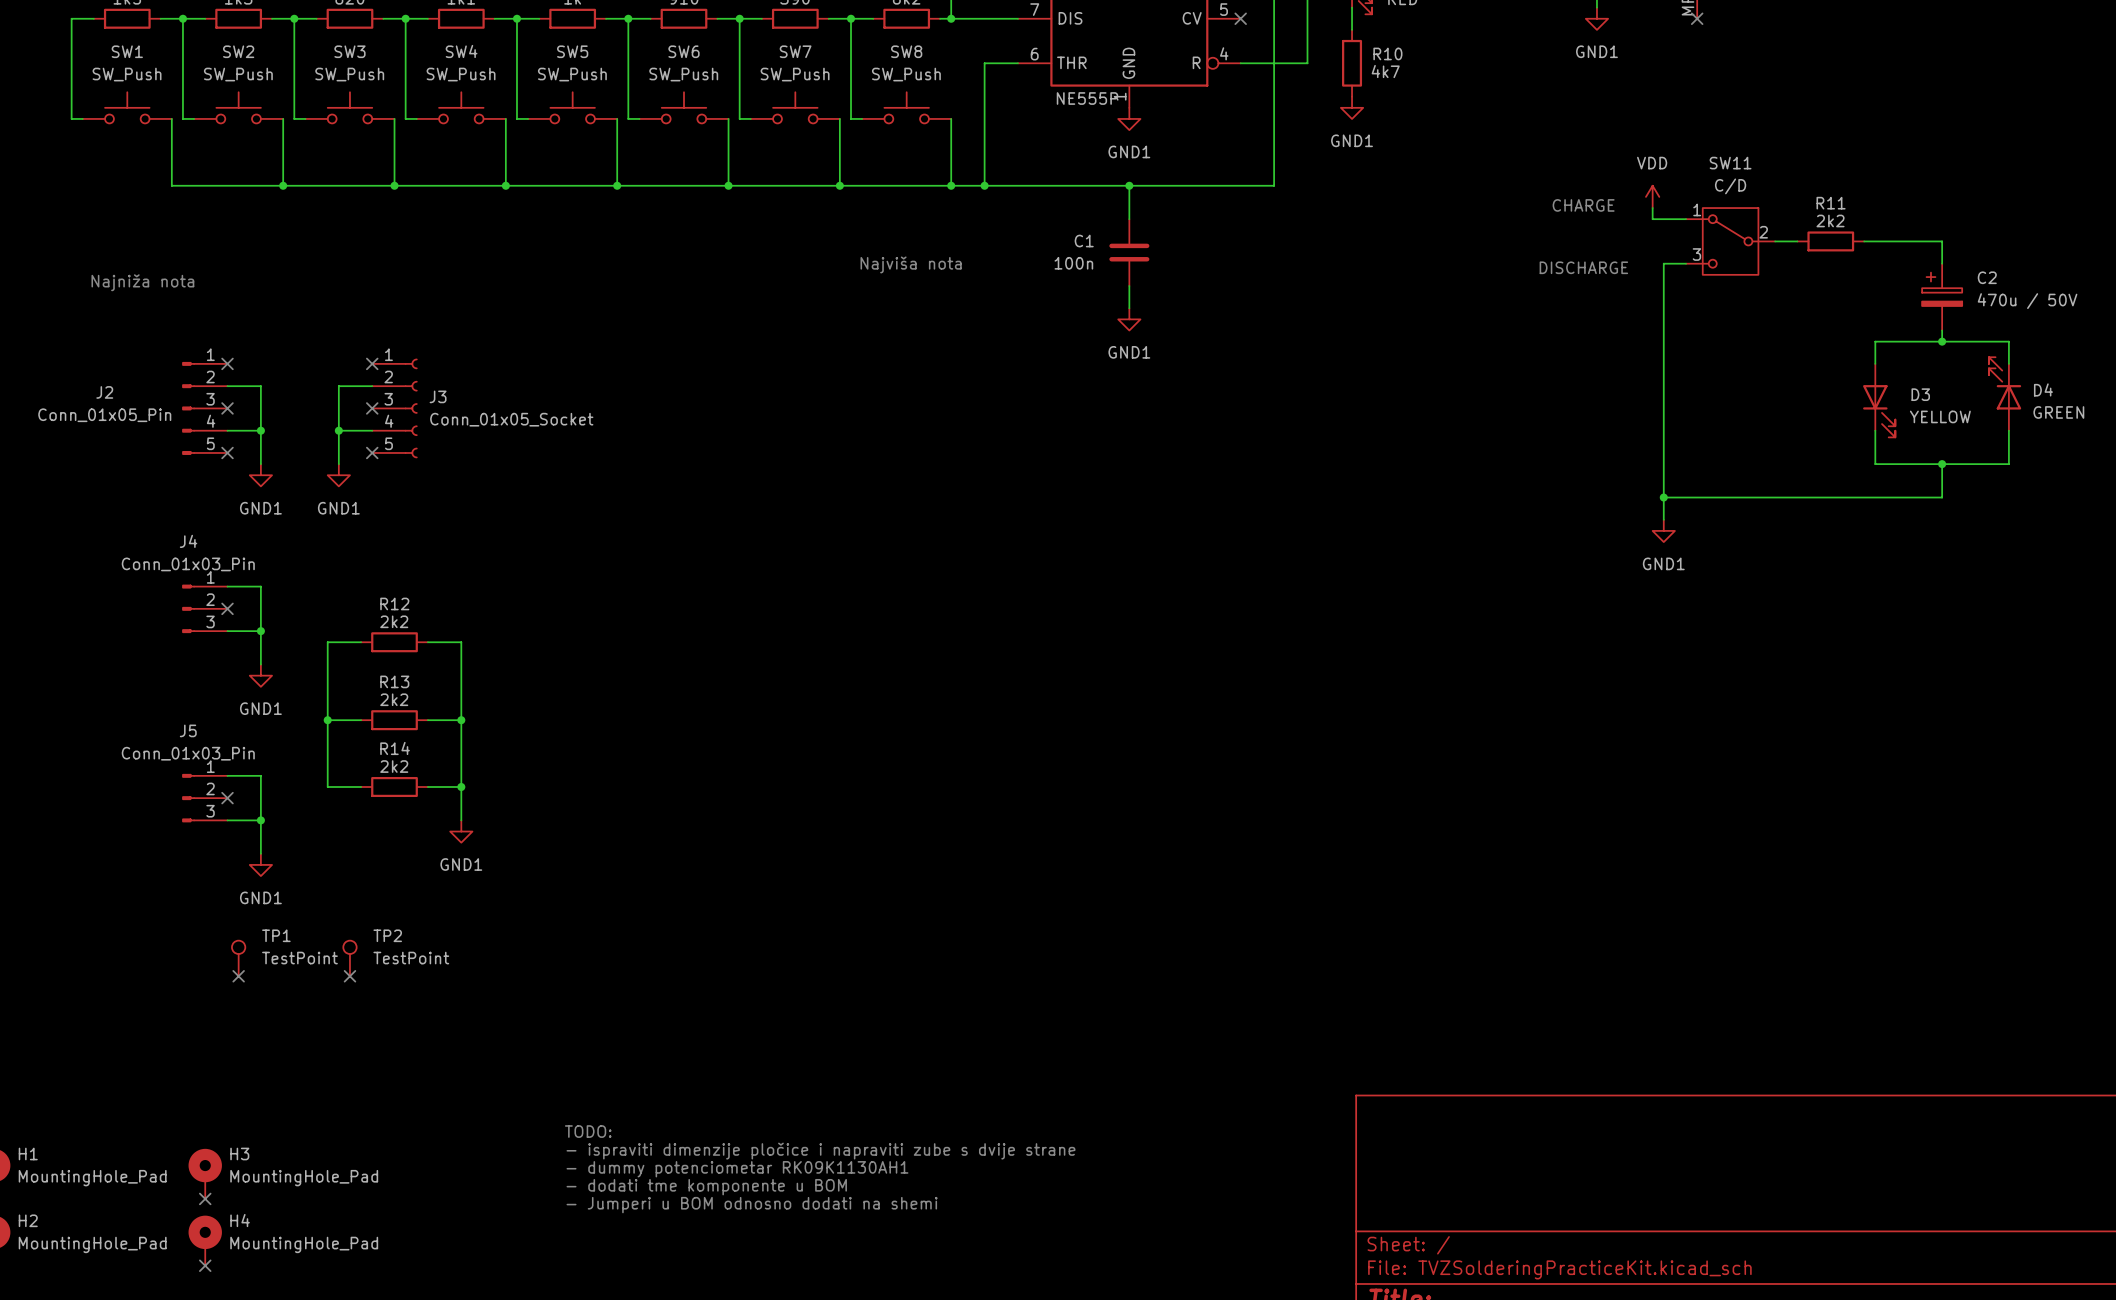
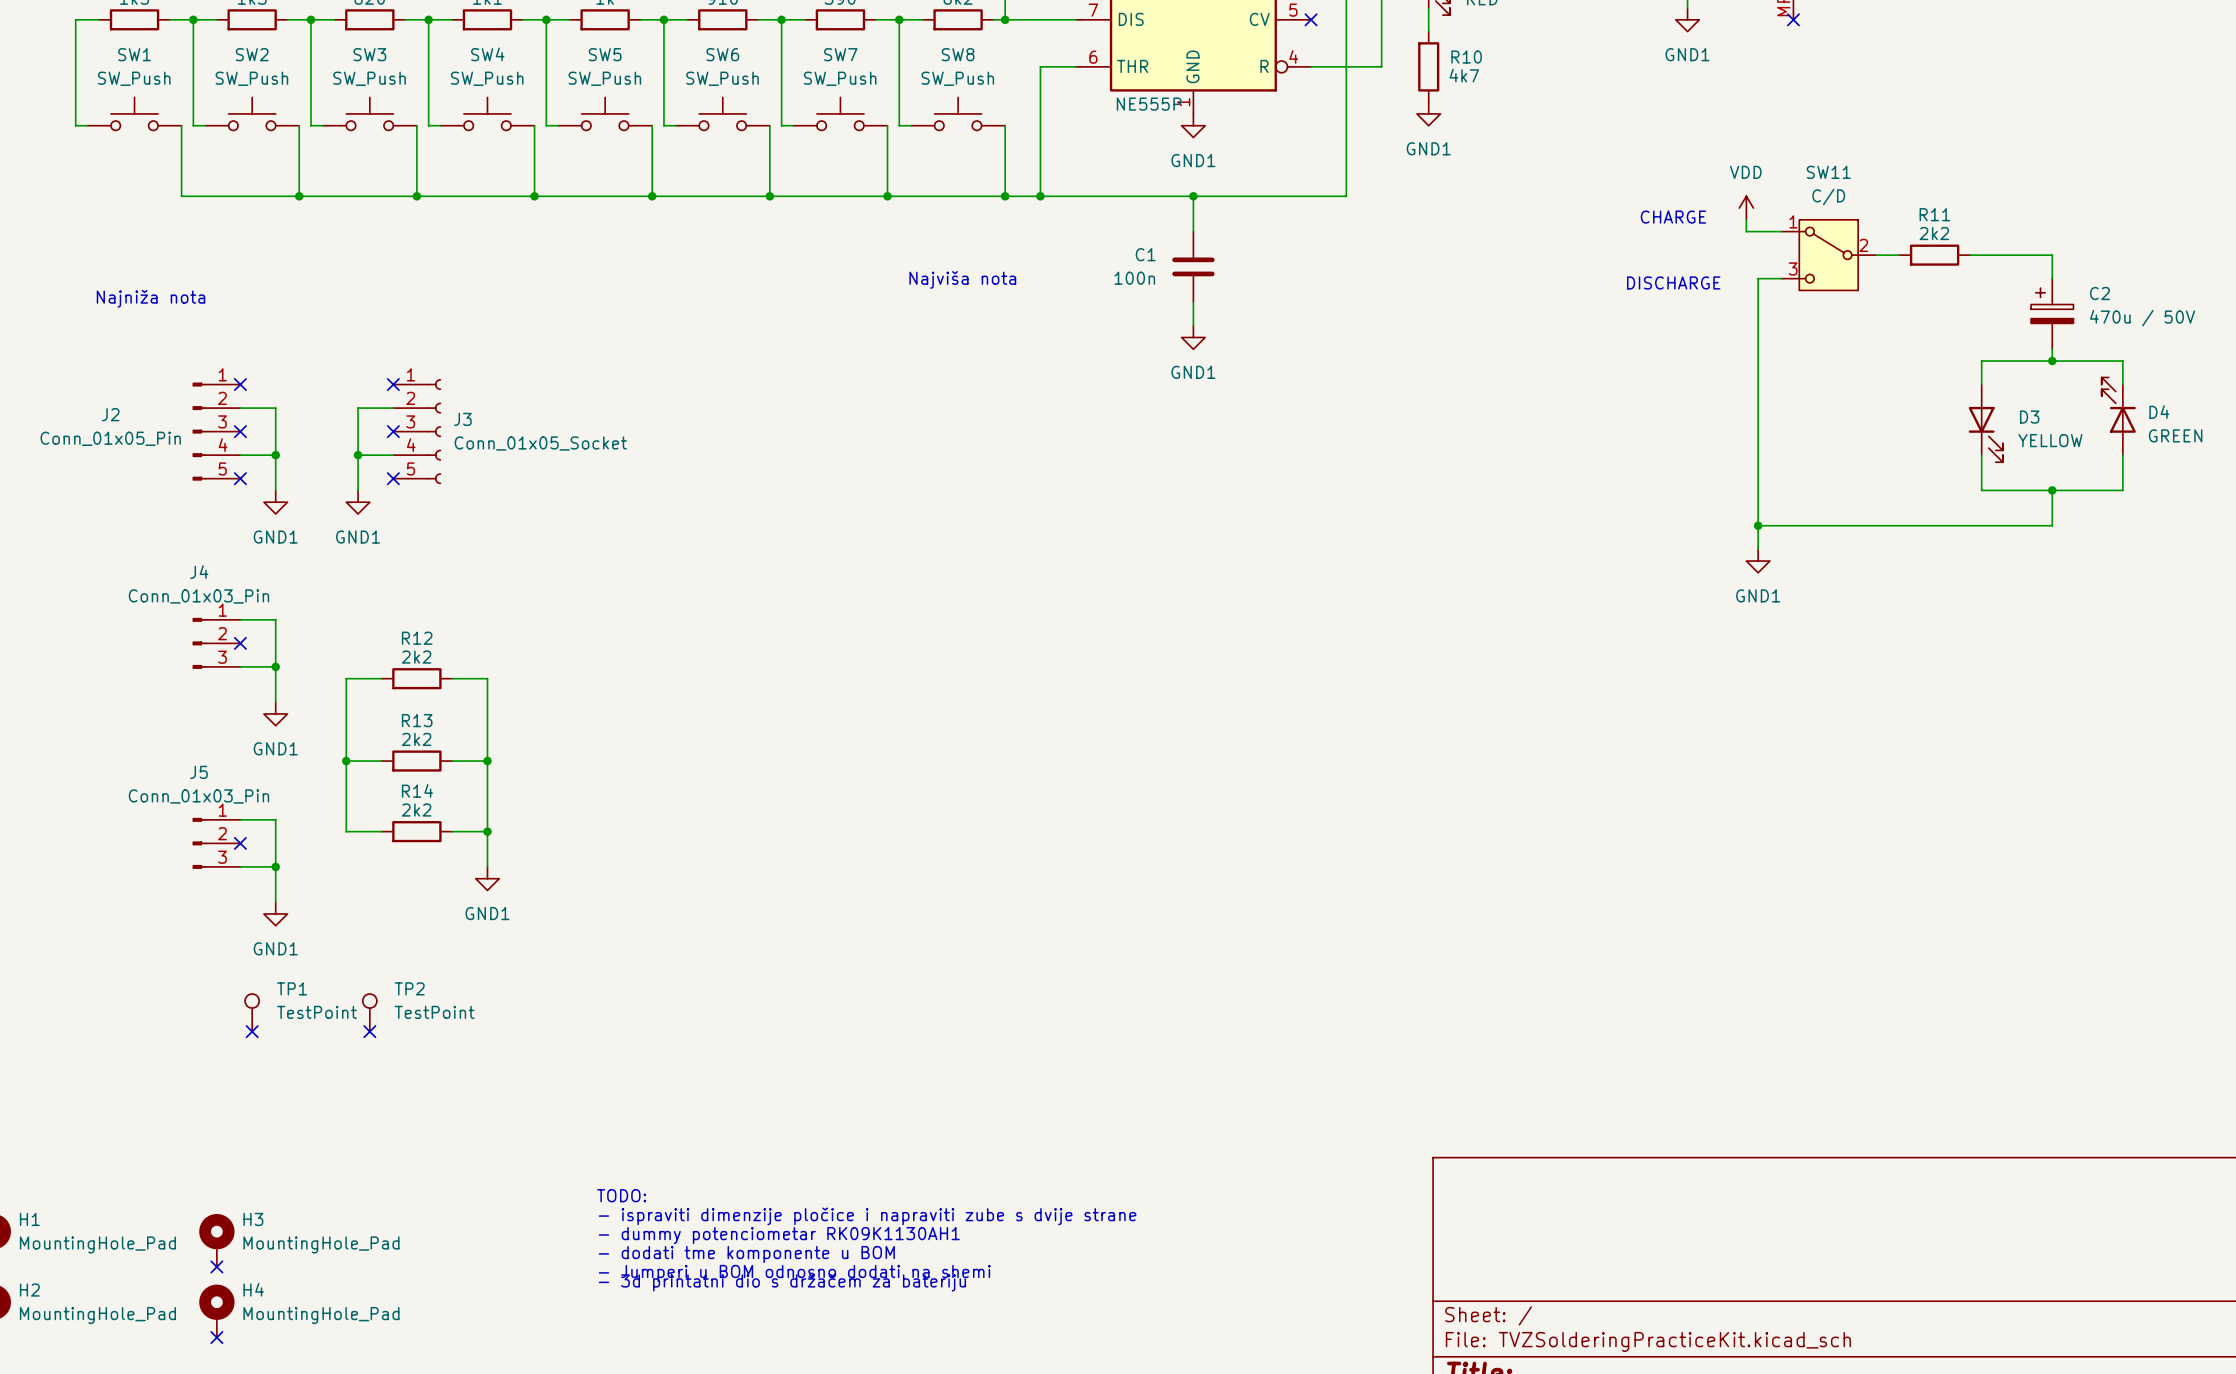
text: none -> - 3d printatni dio s držačem za bateriju (782, 1282)

